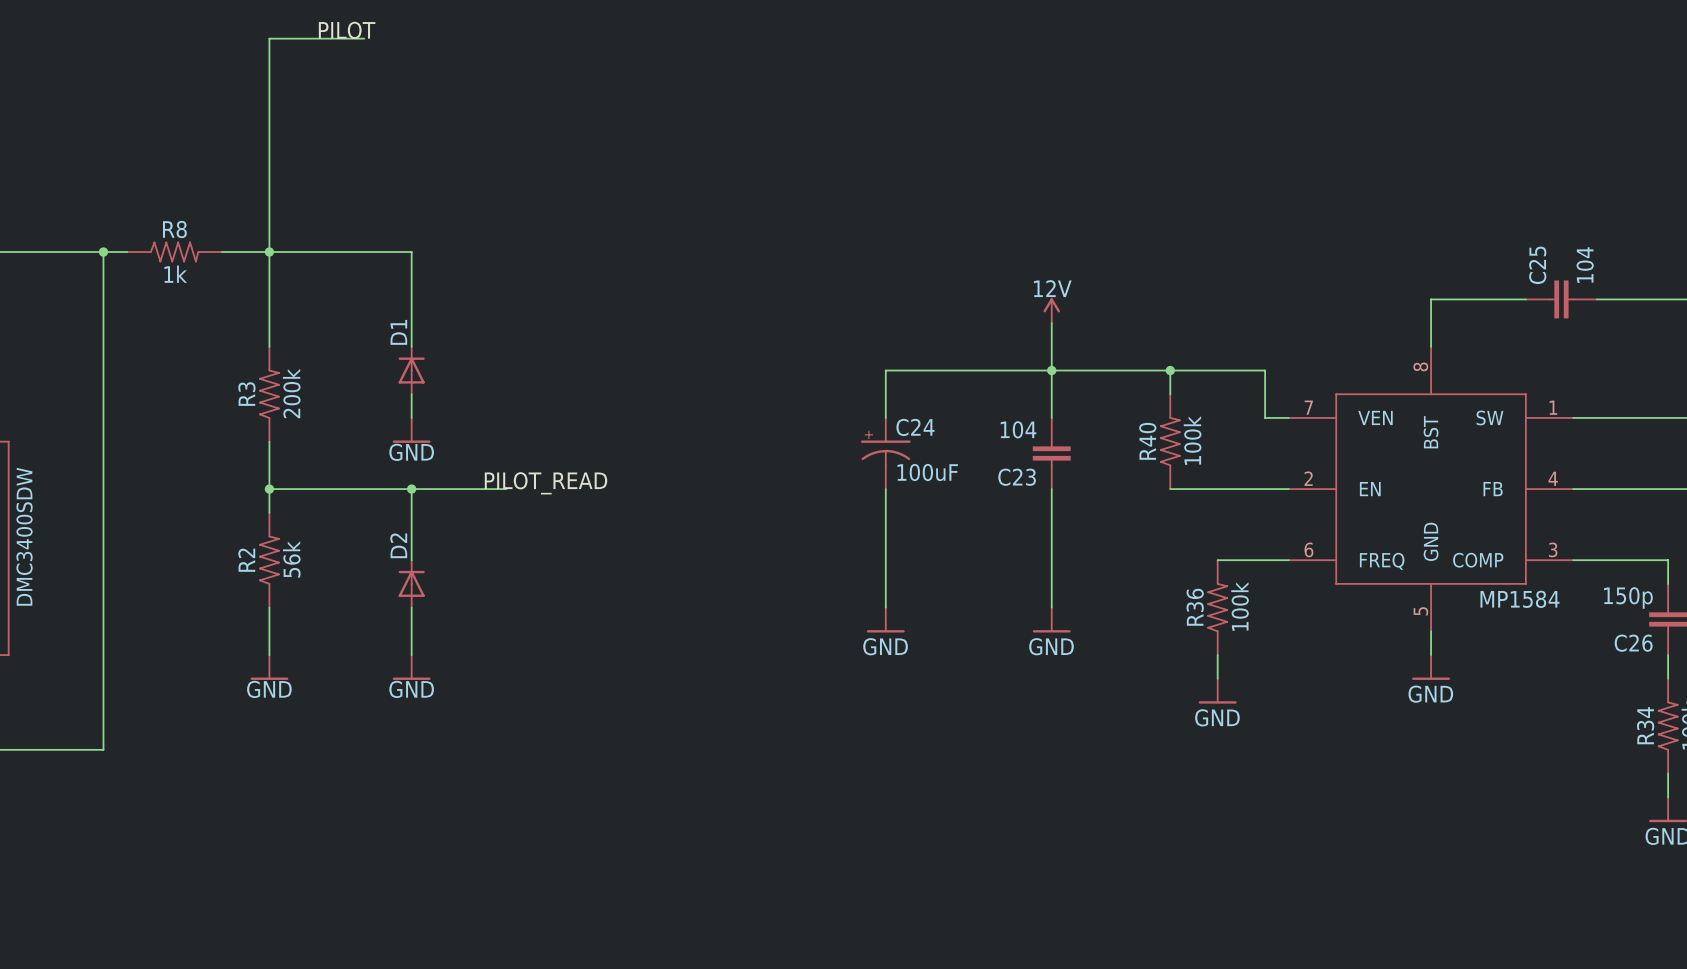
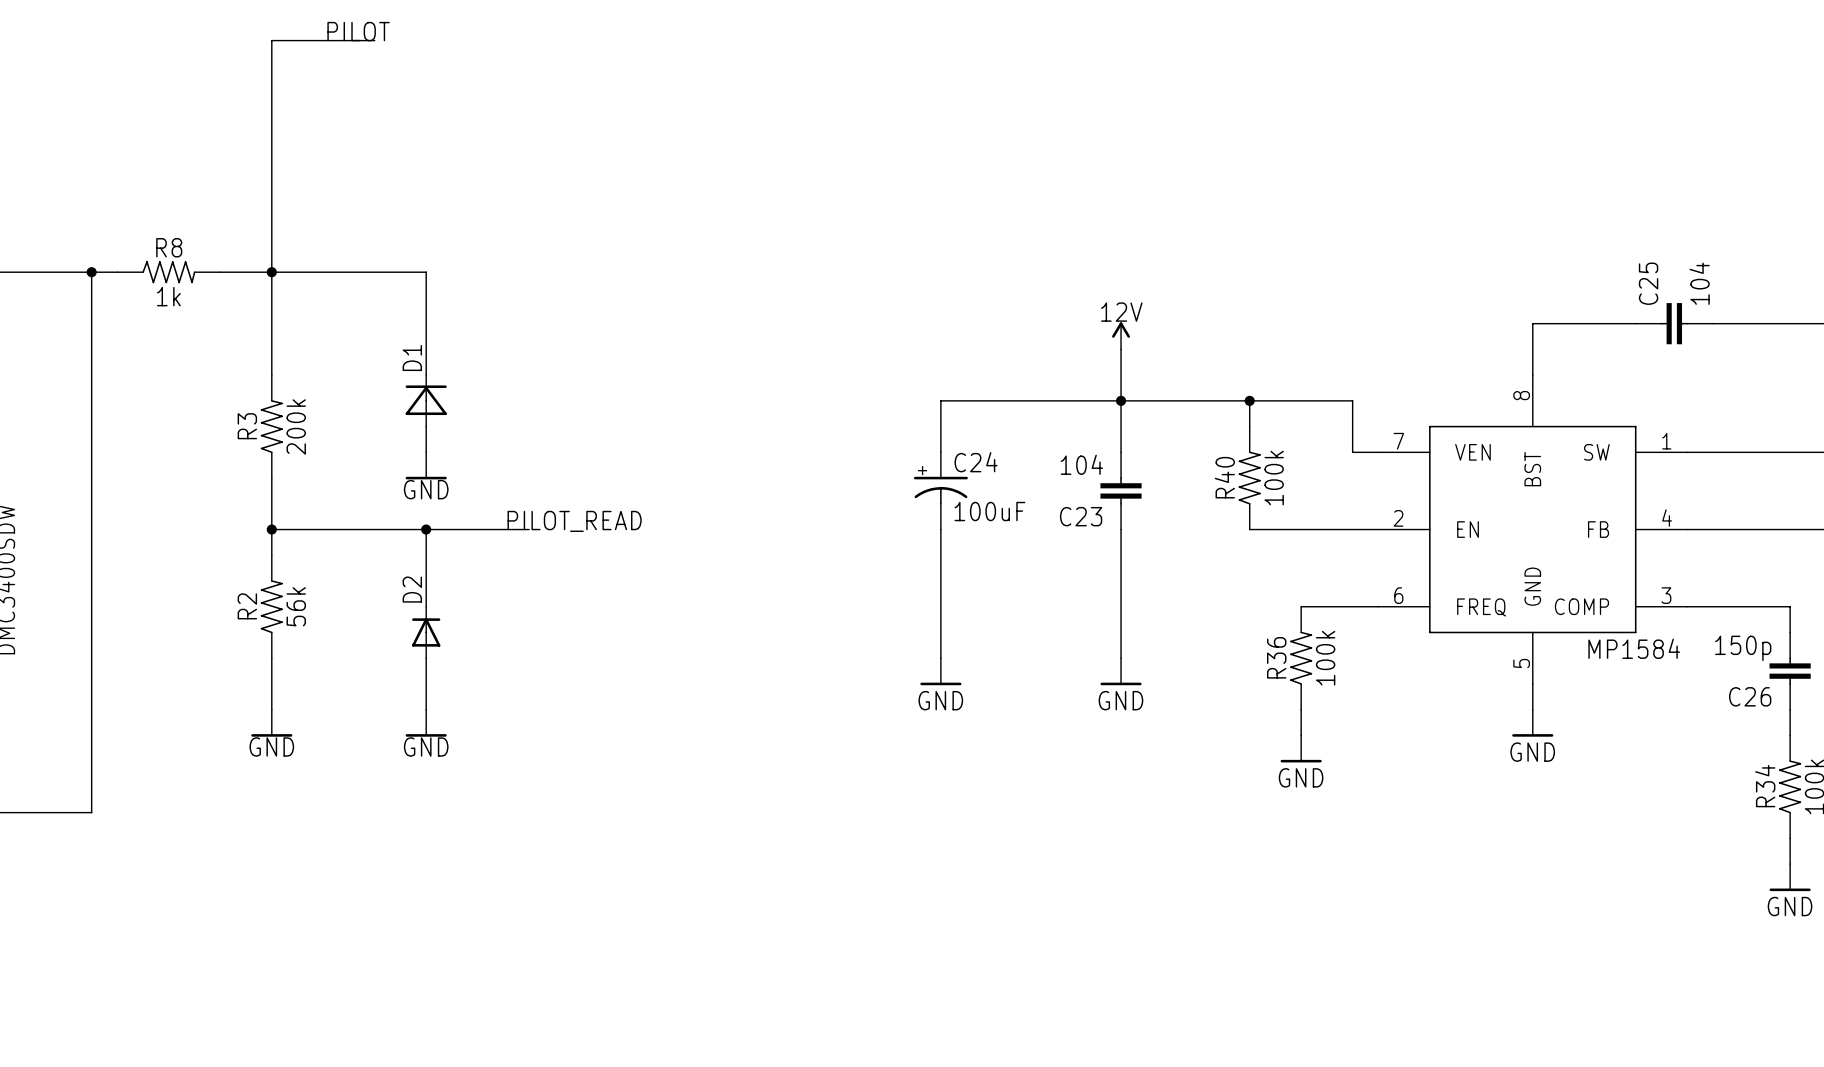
D1 symbol: [398, 346, 425, 395] -> [405, 375, 447, 427]

